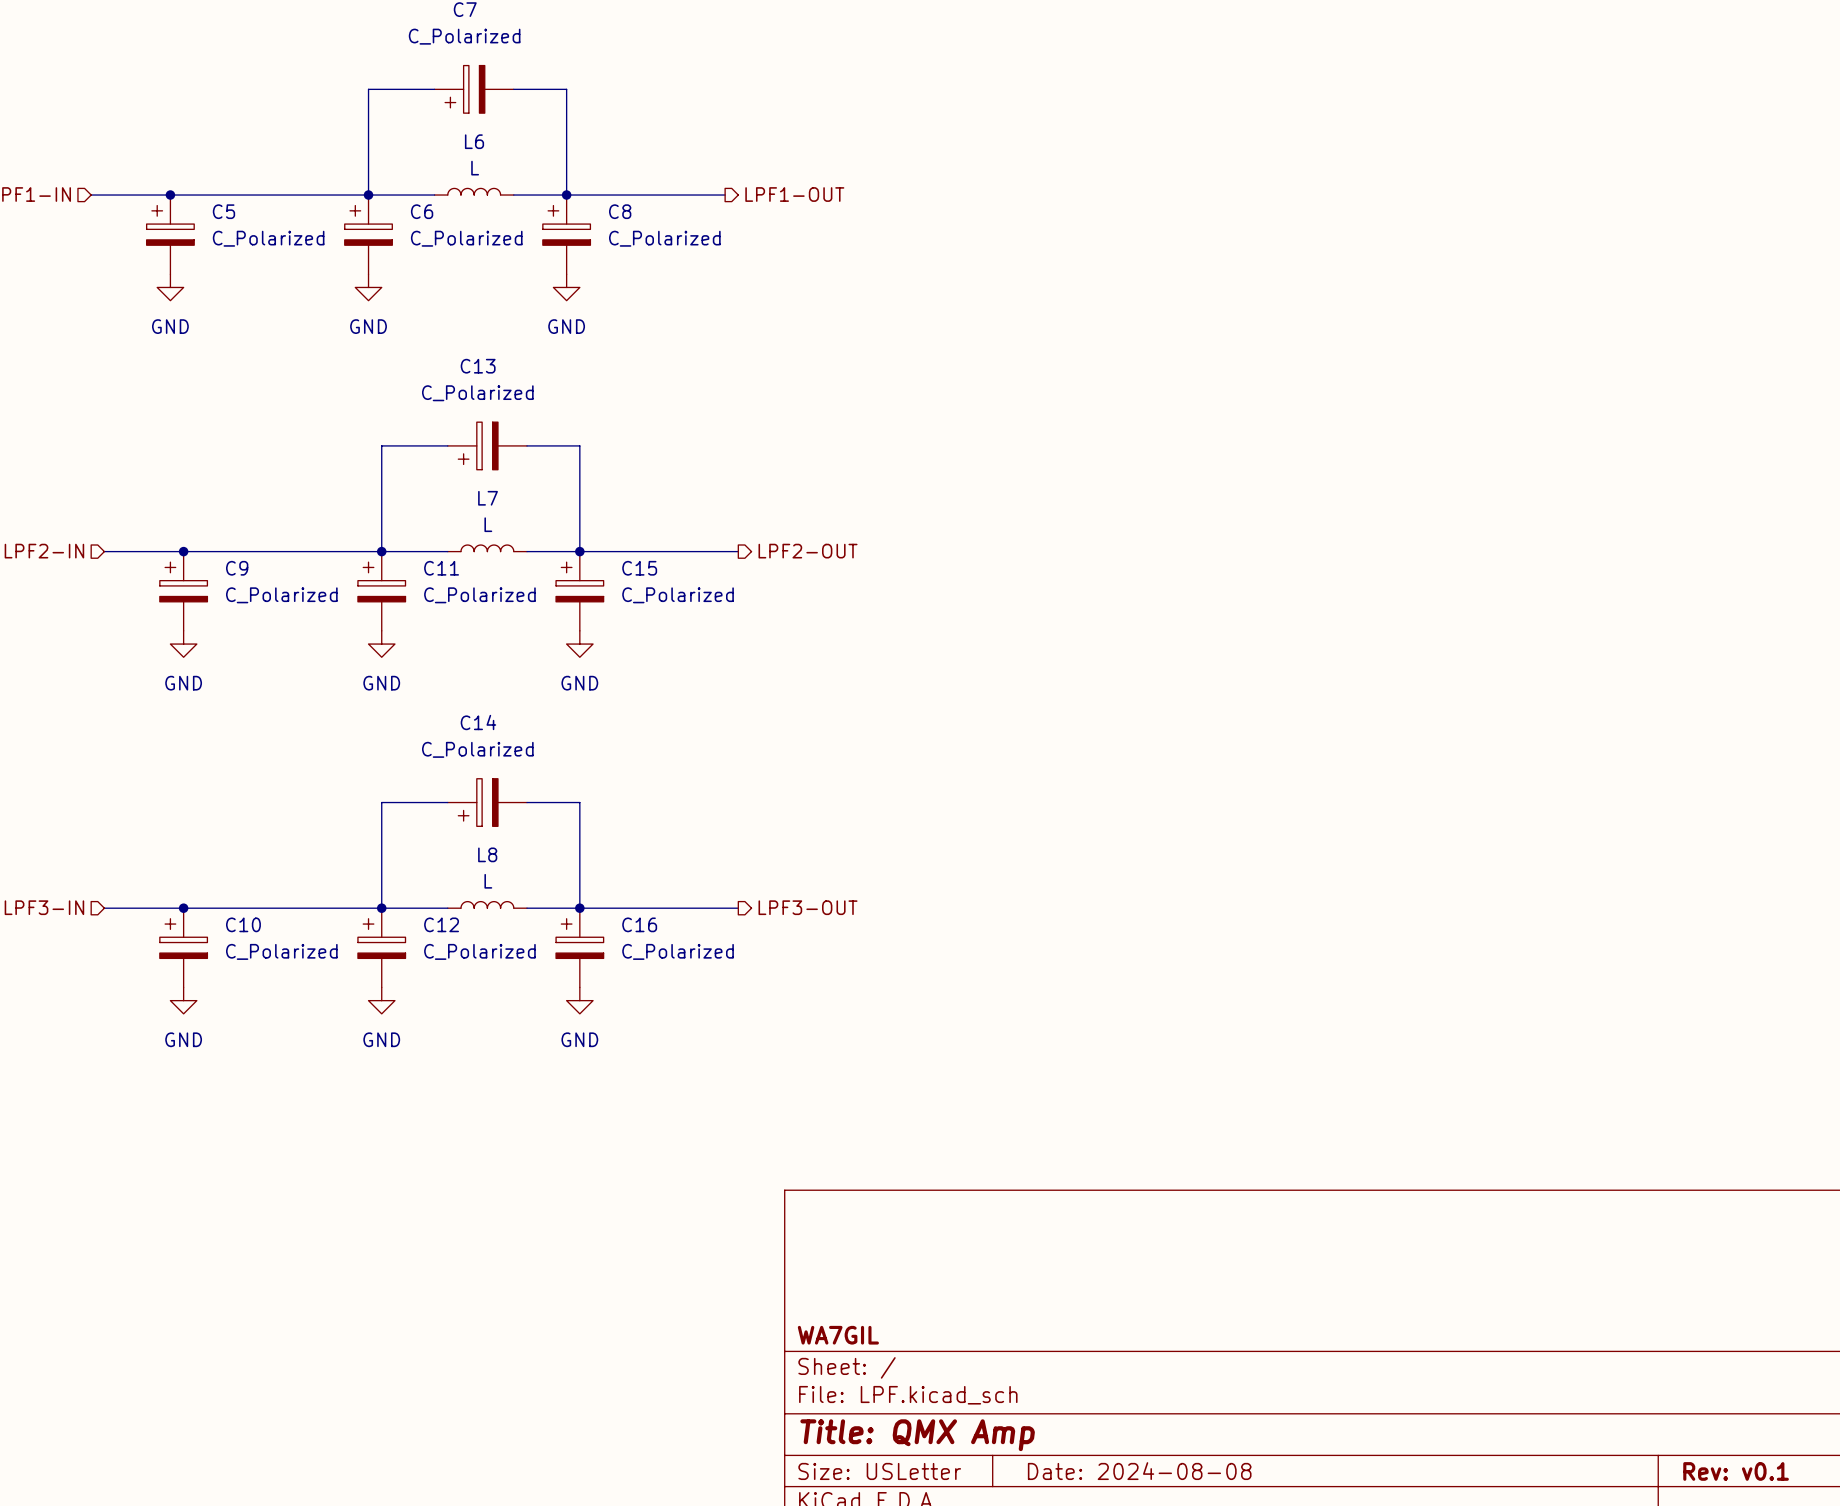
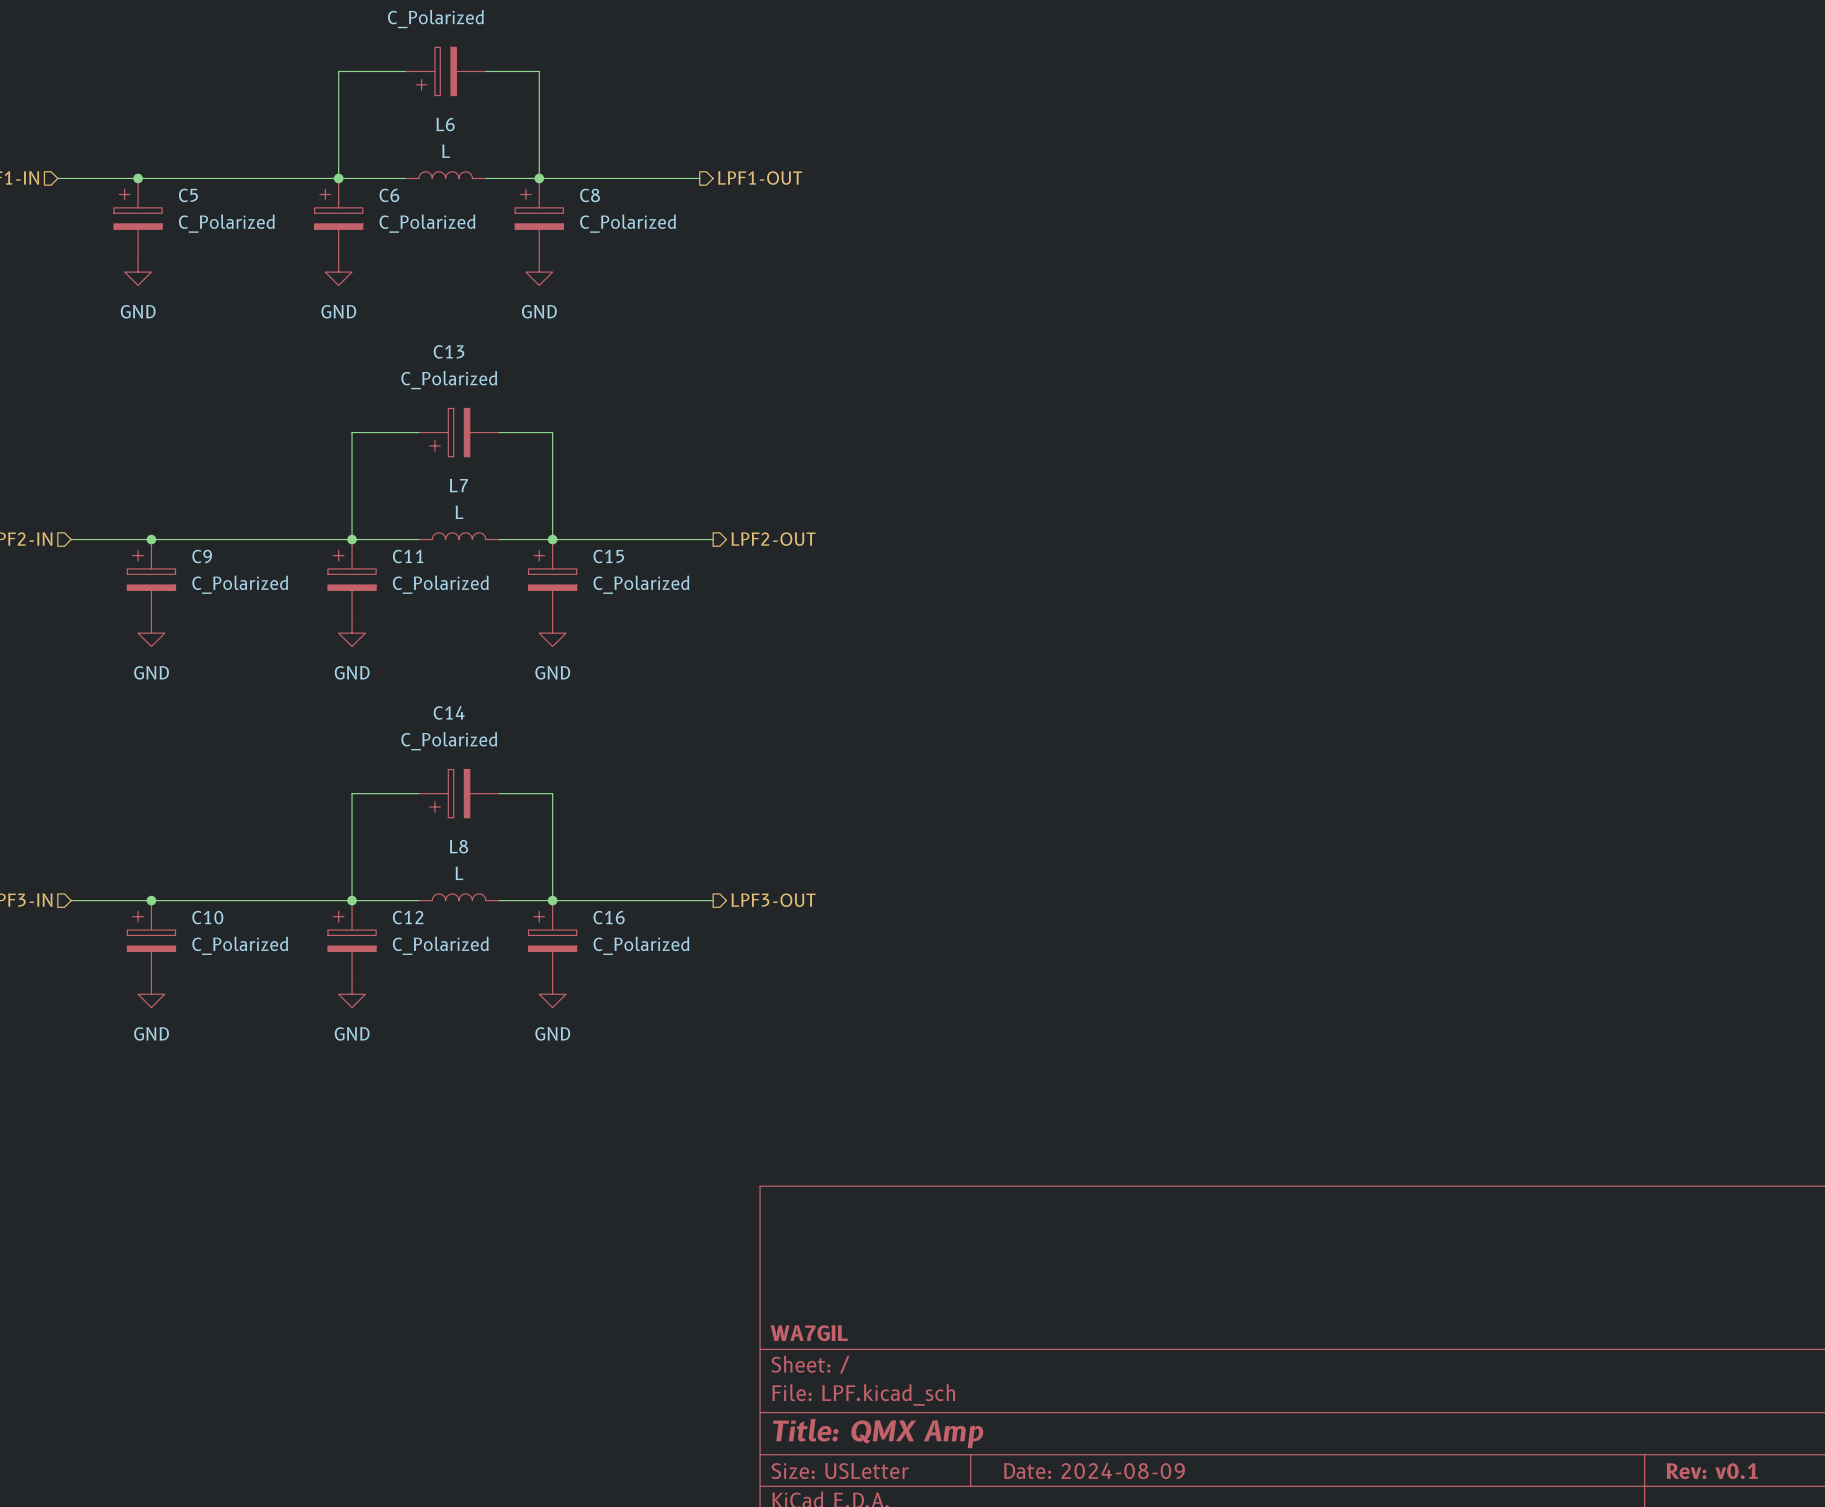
title block: Date: 2024-08-08 (1139, 1471) -> Date: 2024-08-09 (1094, 1471)

